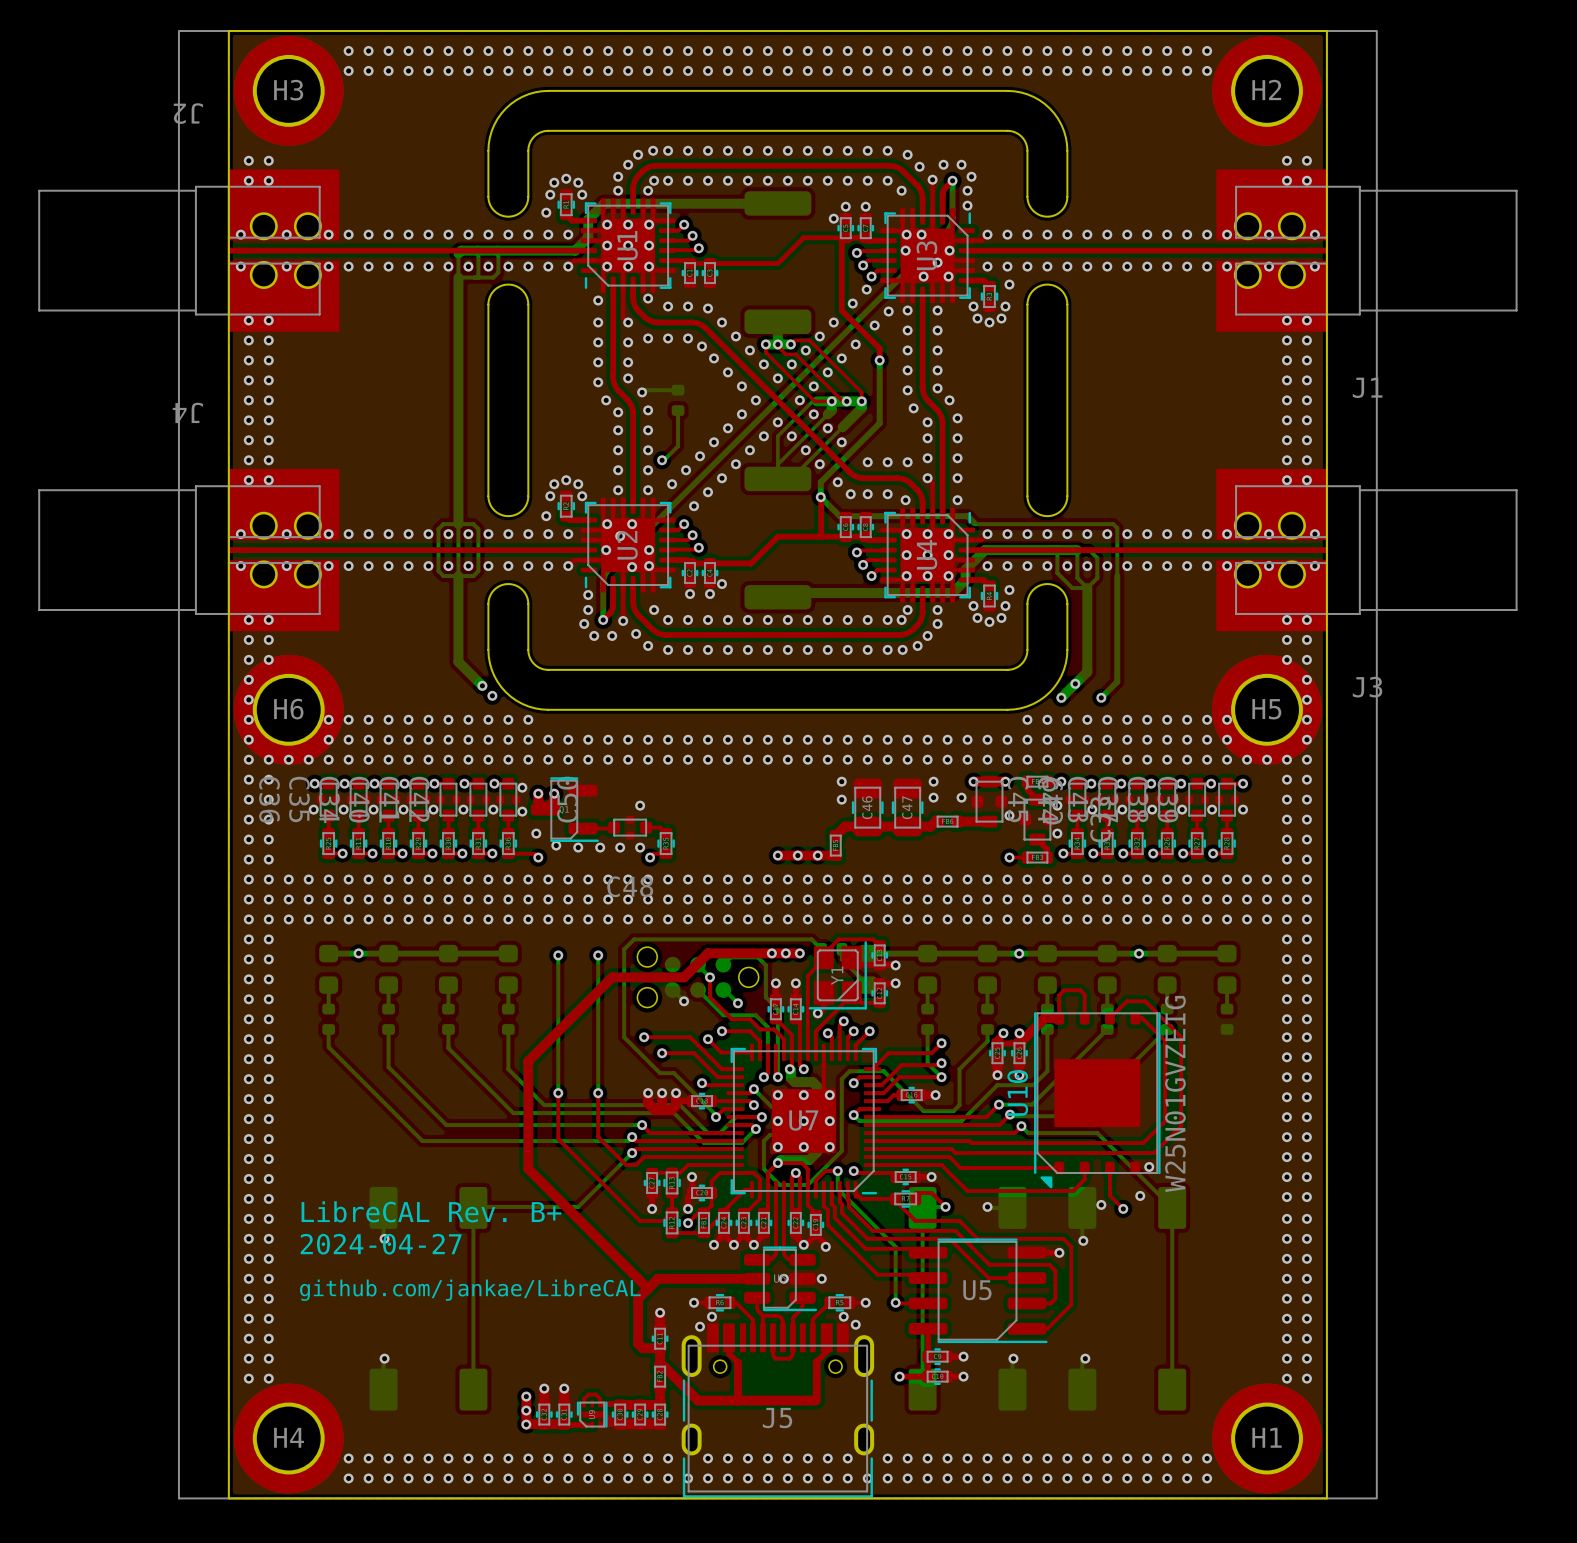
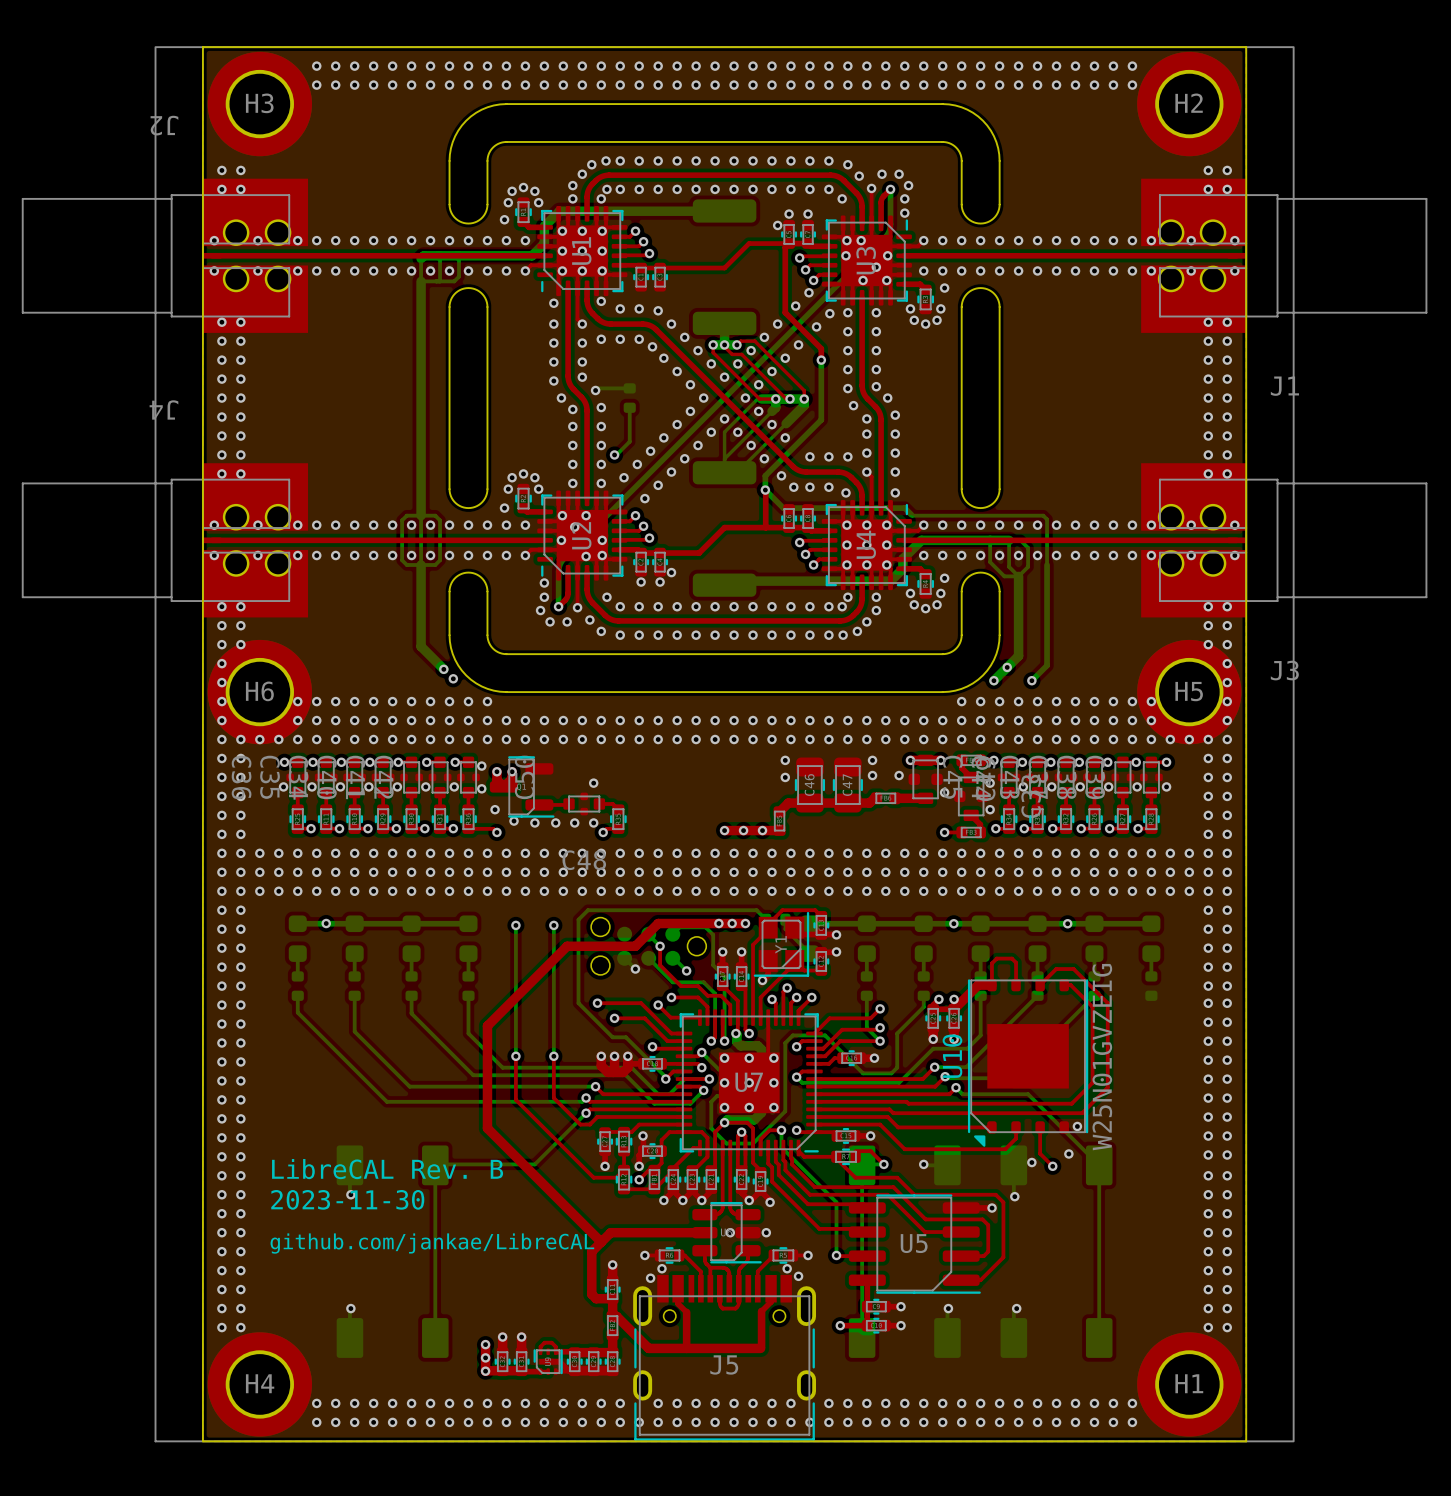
text: LibreCAL Rev. B+ (431, 1211) -> LibreCAL Rev. B (387, 1169)
text: 2024-04-27 (381, 1244) -> 2023-11-30 (347, 1199)

